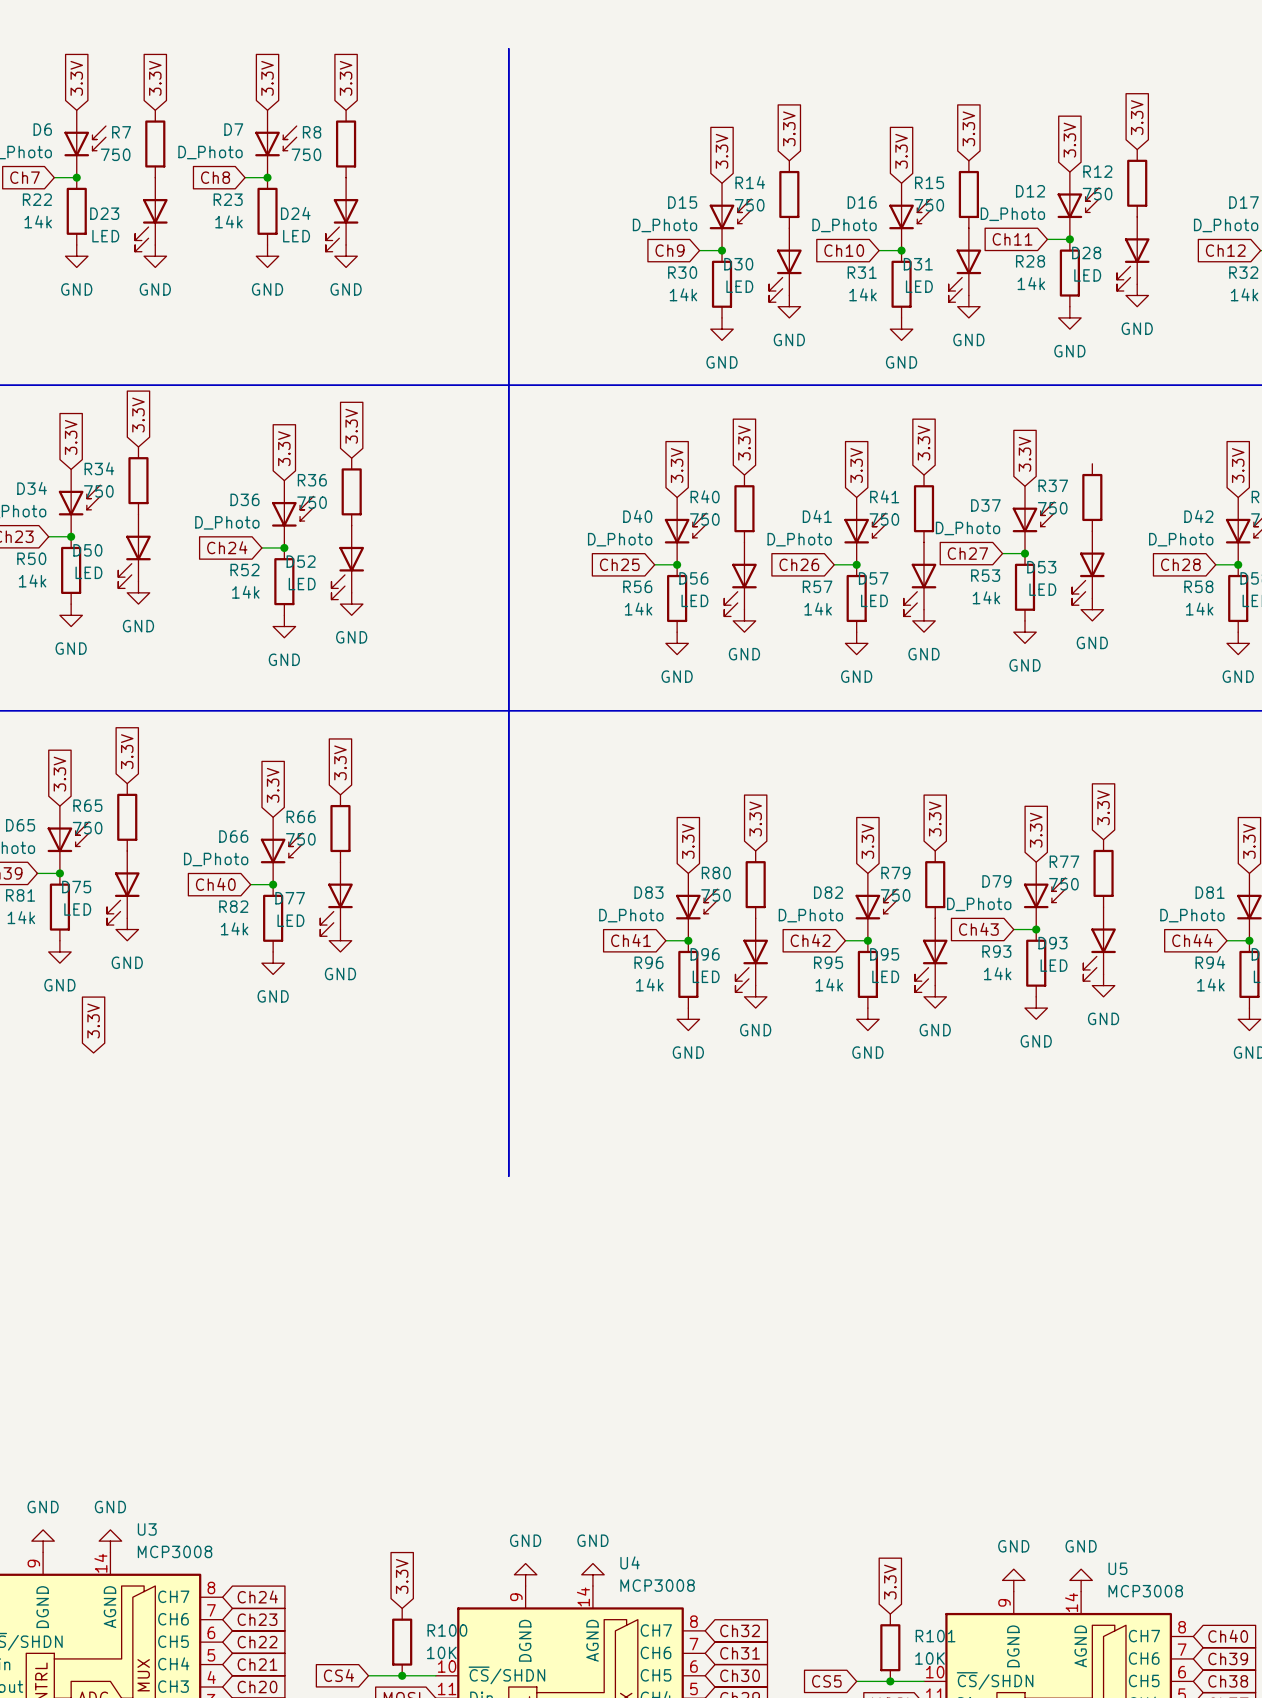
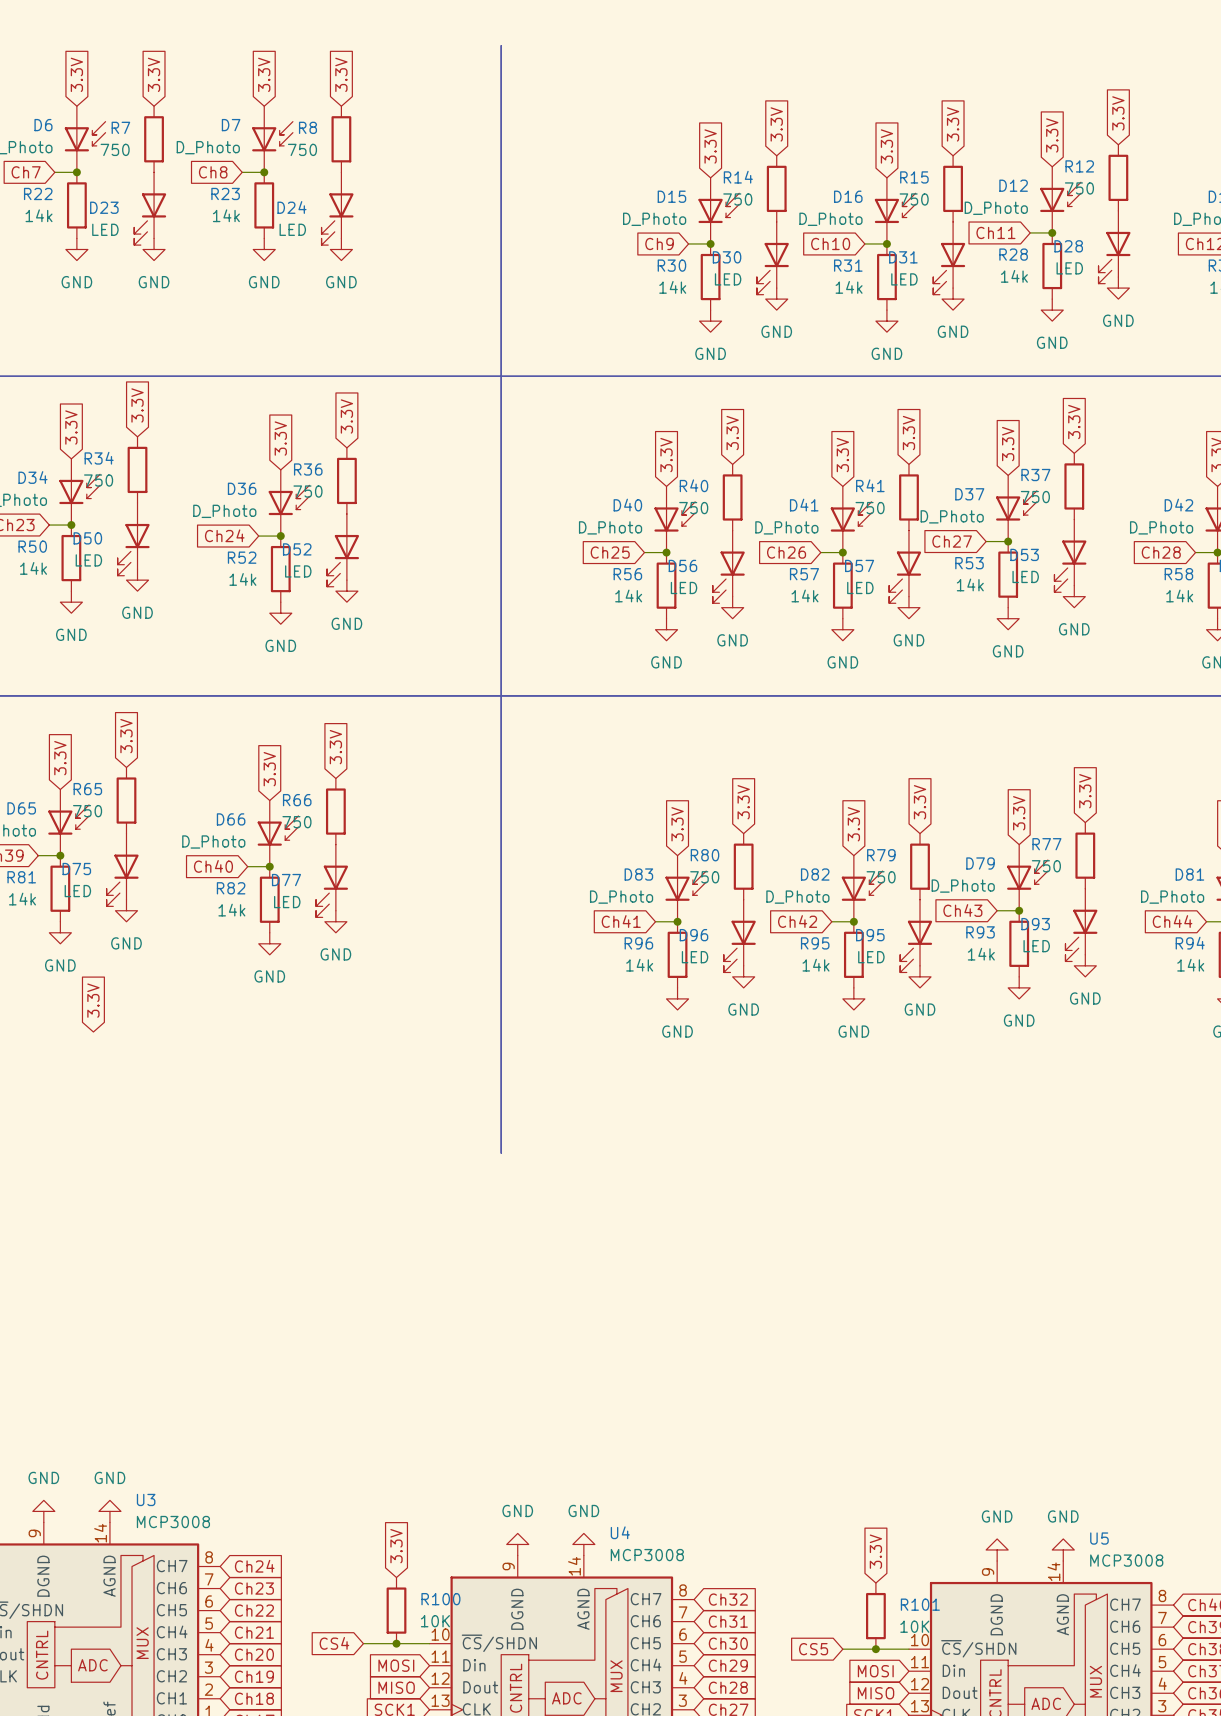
global label: none -> 3.3V (1074, 422)

